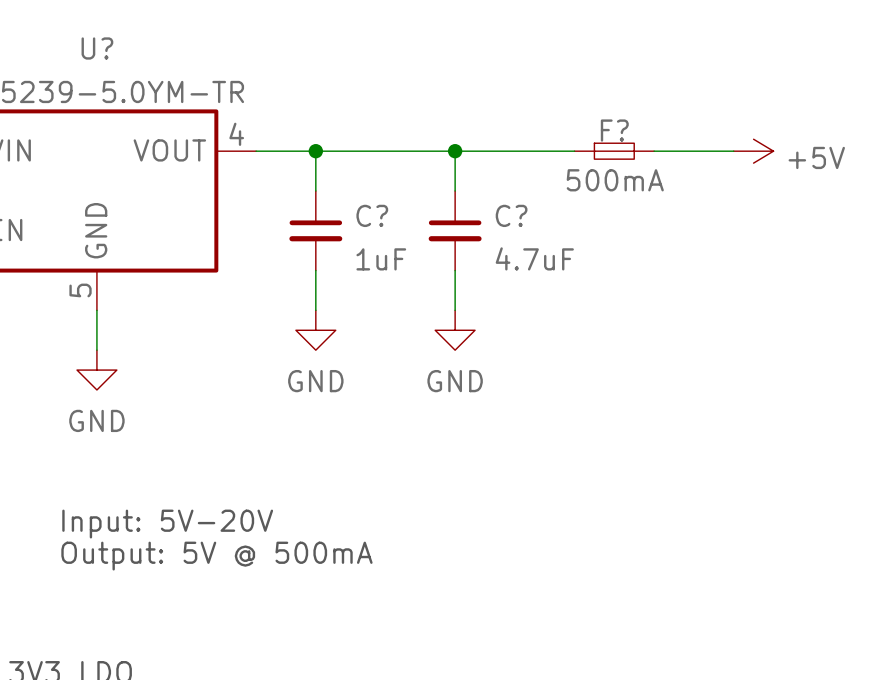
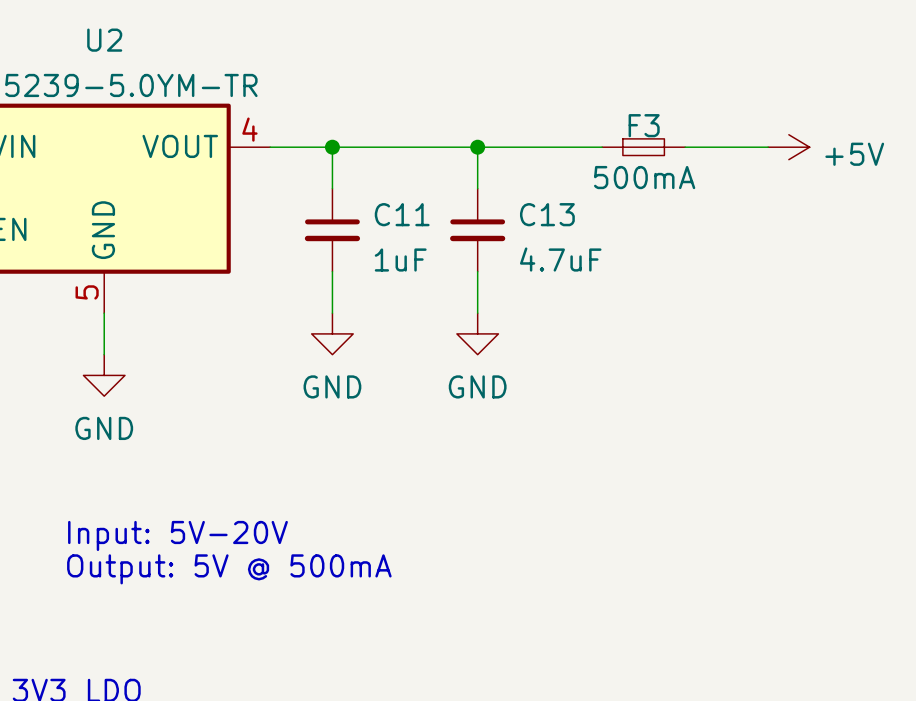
U? name: U? (97, 48) -> U2 (104, 40)
F? name: F? (614, 130) -> F3 (644, 125)
C? name: C? (372, 215) -> C11 (402, 214)
C? name: C? (511, 215) -> C13 (547, 214)

